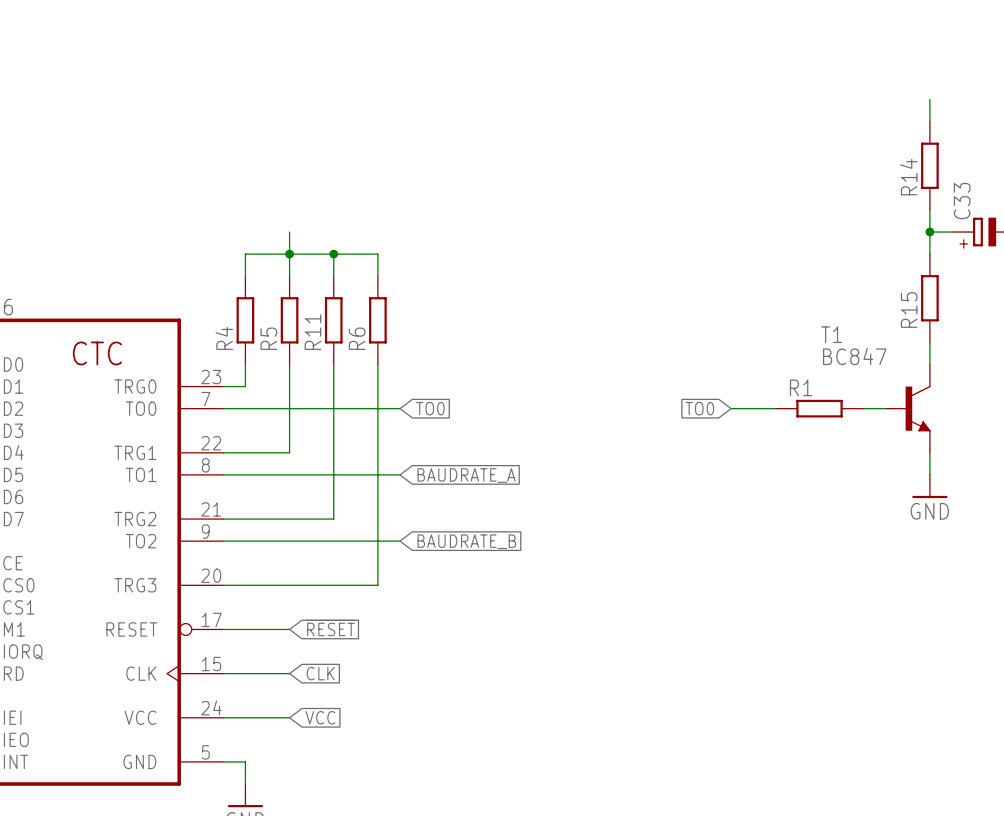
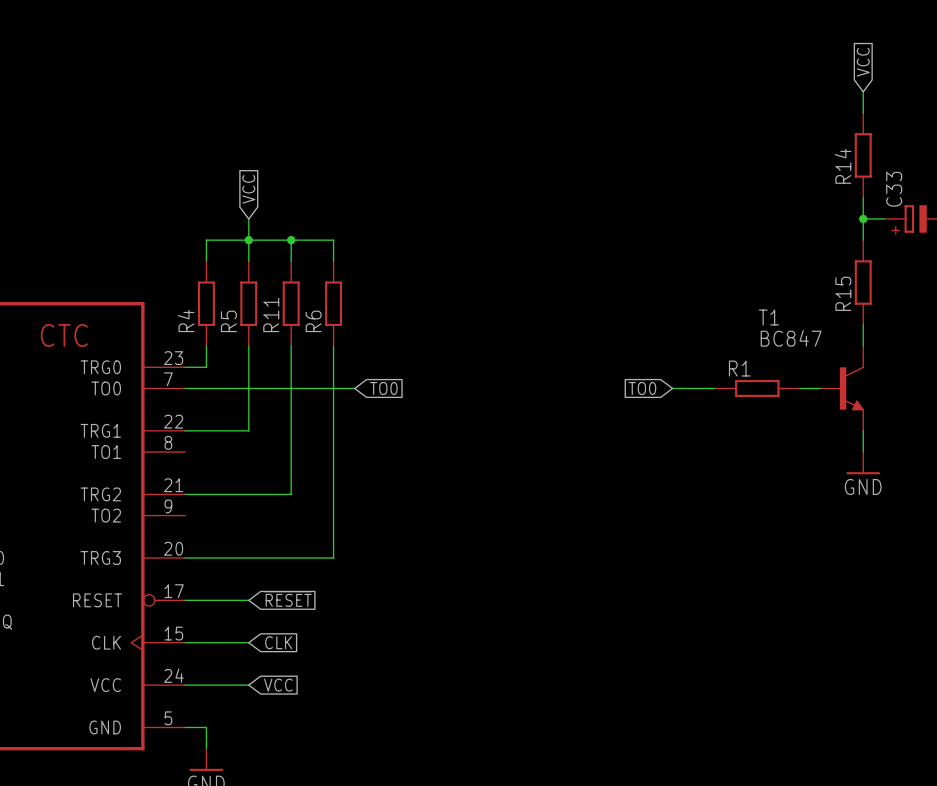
global label: none -> VCC (863, 62)
global label: none -> VCC (248, 189)
wire: (223, 474) (399, 474) -> none
global label: BAUDRATE_A (466, 475) -> none
wire: (223, 541) (399, 541) -> none
global label: BAUDRATE_B (466, 541) -> none

